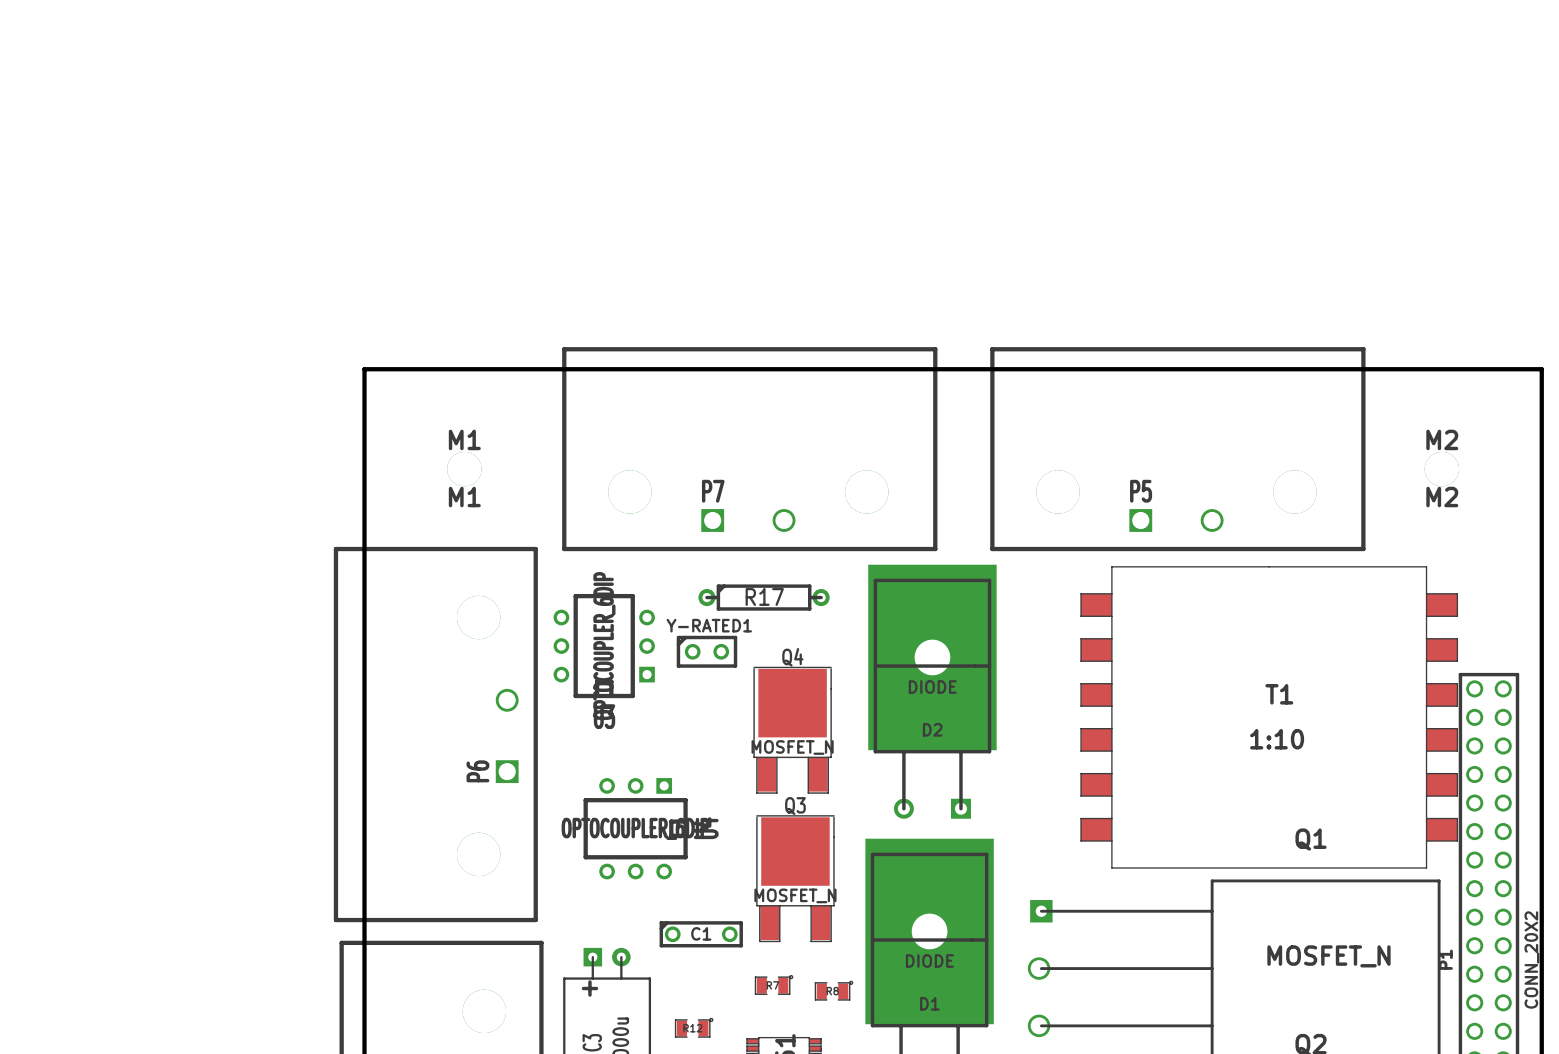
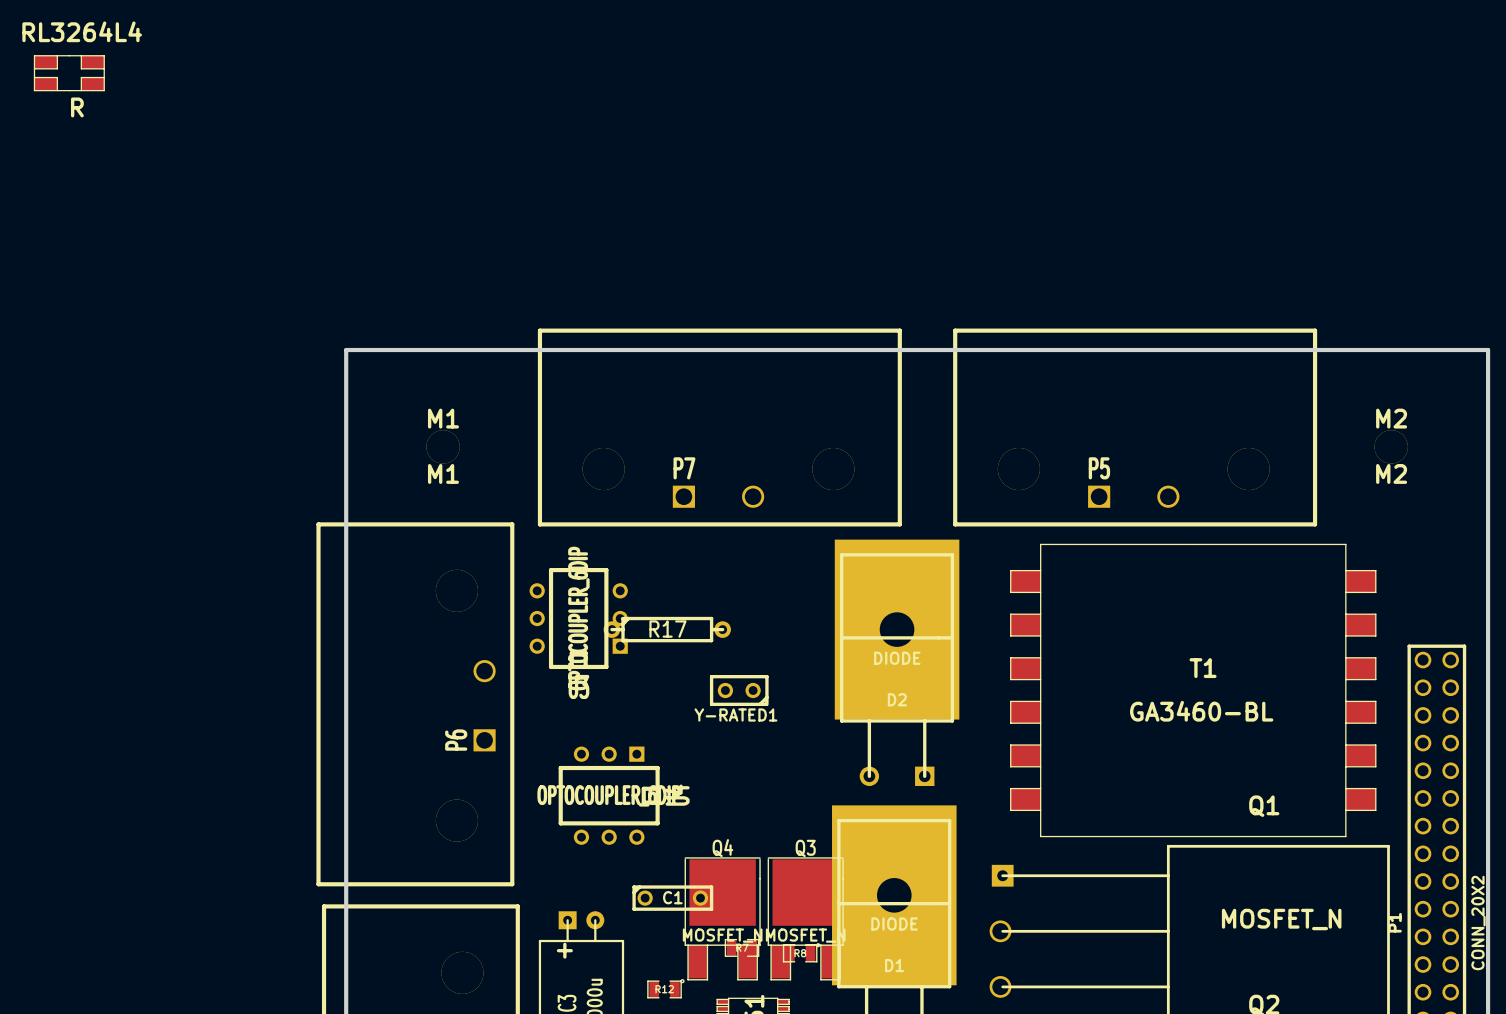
RL3264L4: none -> R (69, 73)
R17 position: (764, 597) -> (667, 629)
Y-RATED1 rotation: 0° (706, 651) -> 180° (739, 690)
Y-RATED1 position: (706, 651) -> (739, 690)
T1 position: (1269, 717) -> (1193, 690)
Q4 position: (792, 730) -> (722, 918)
T1 value: 1:10 (1277, 739) -> GA3460-BL (1201, 711)
Q3 position: (795, 878) -> (805, 918)

